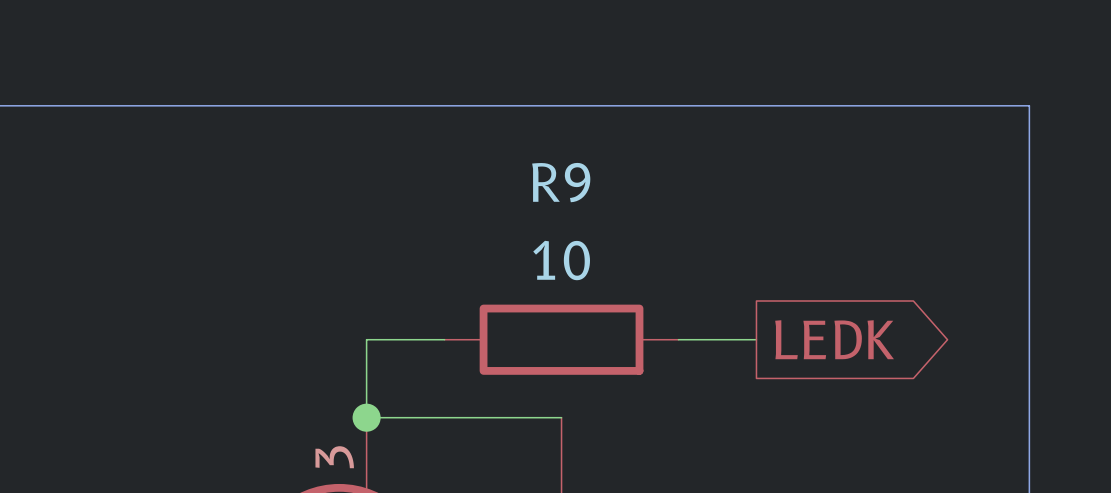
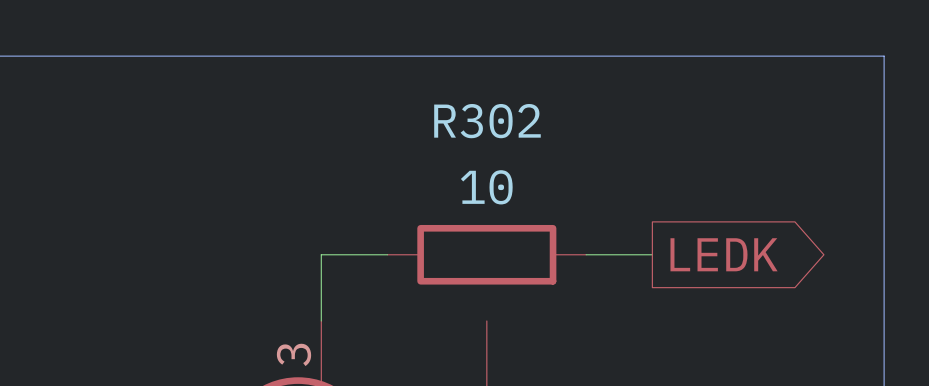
R9 name: R9 (561, 182) -> R302 (487, 121)
wire: (366, 417) (561, 417) -> none
junction: (366, 417) -> none

